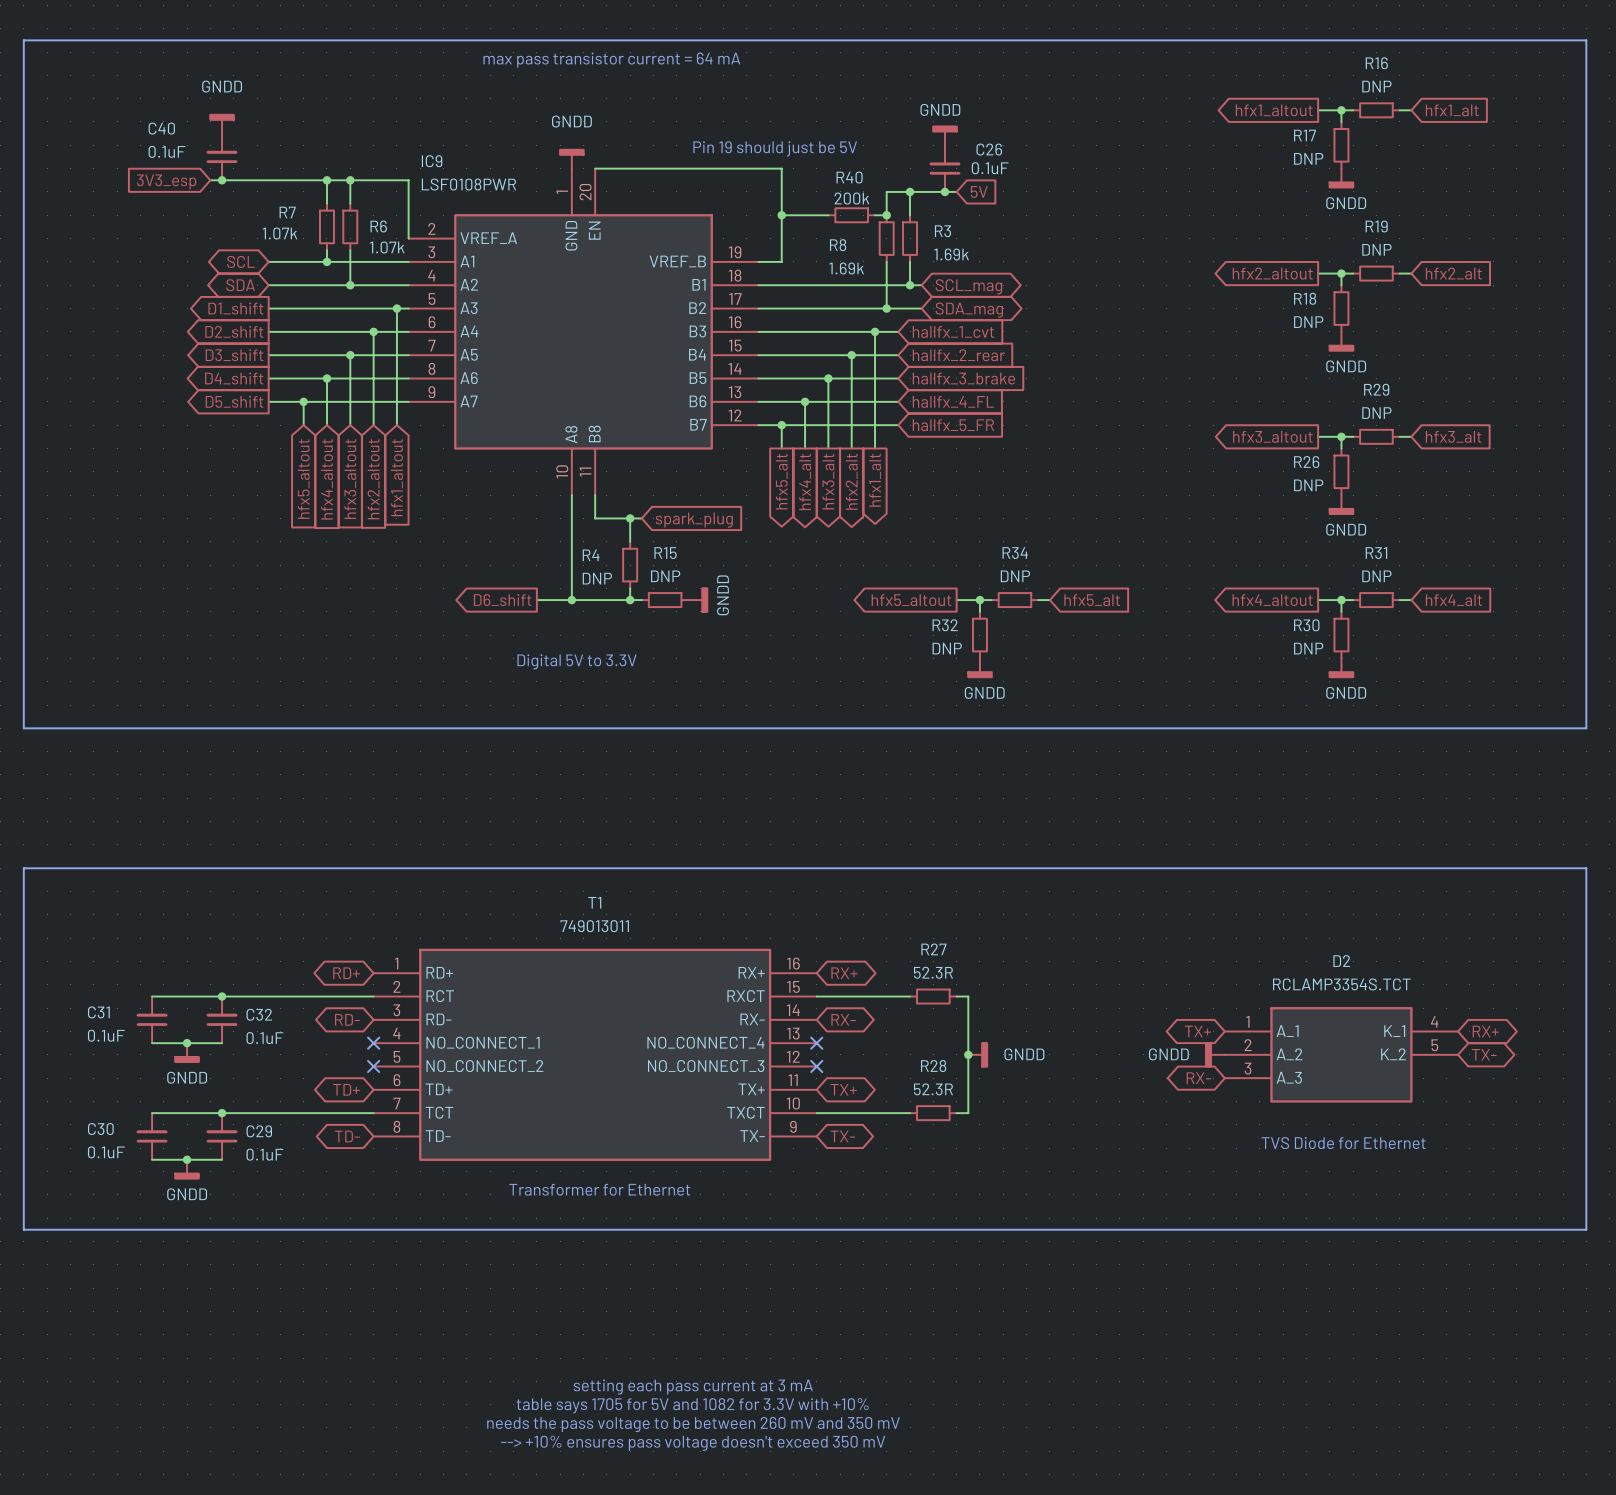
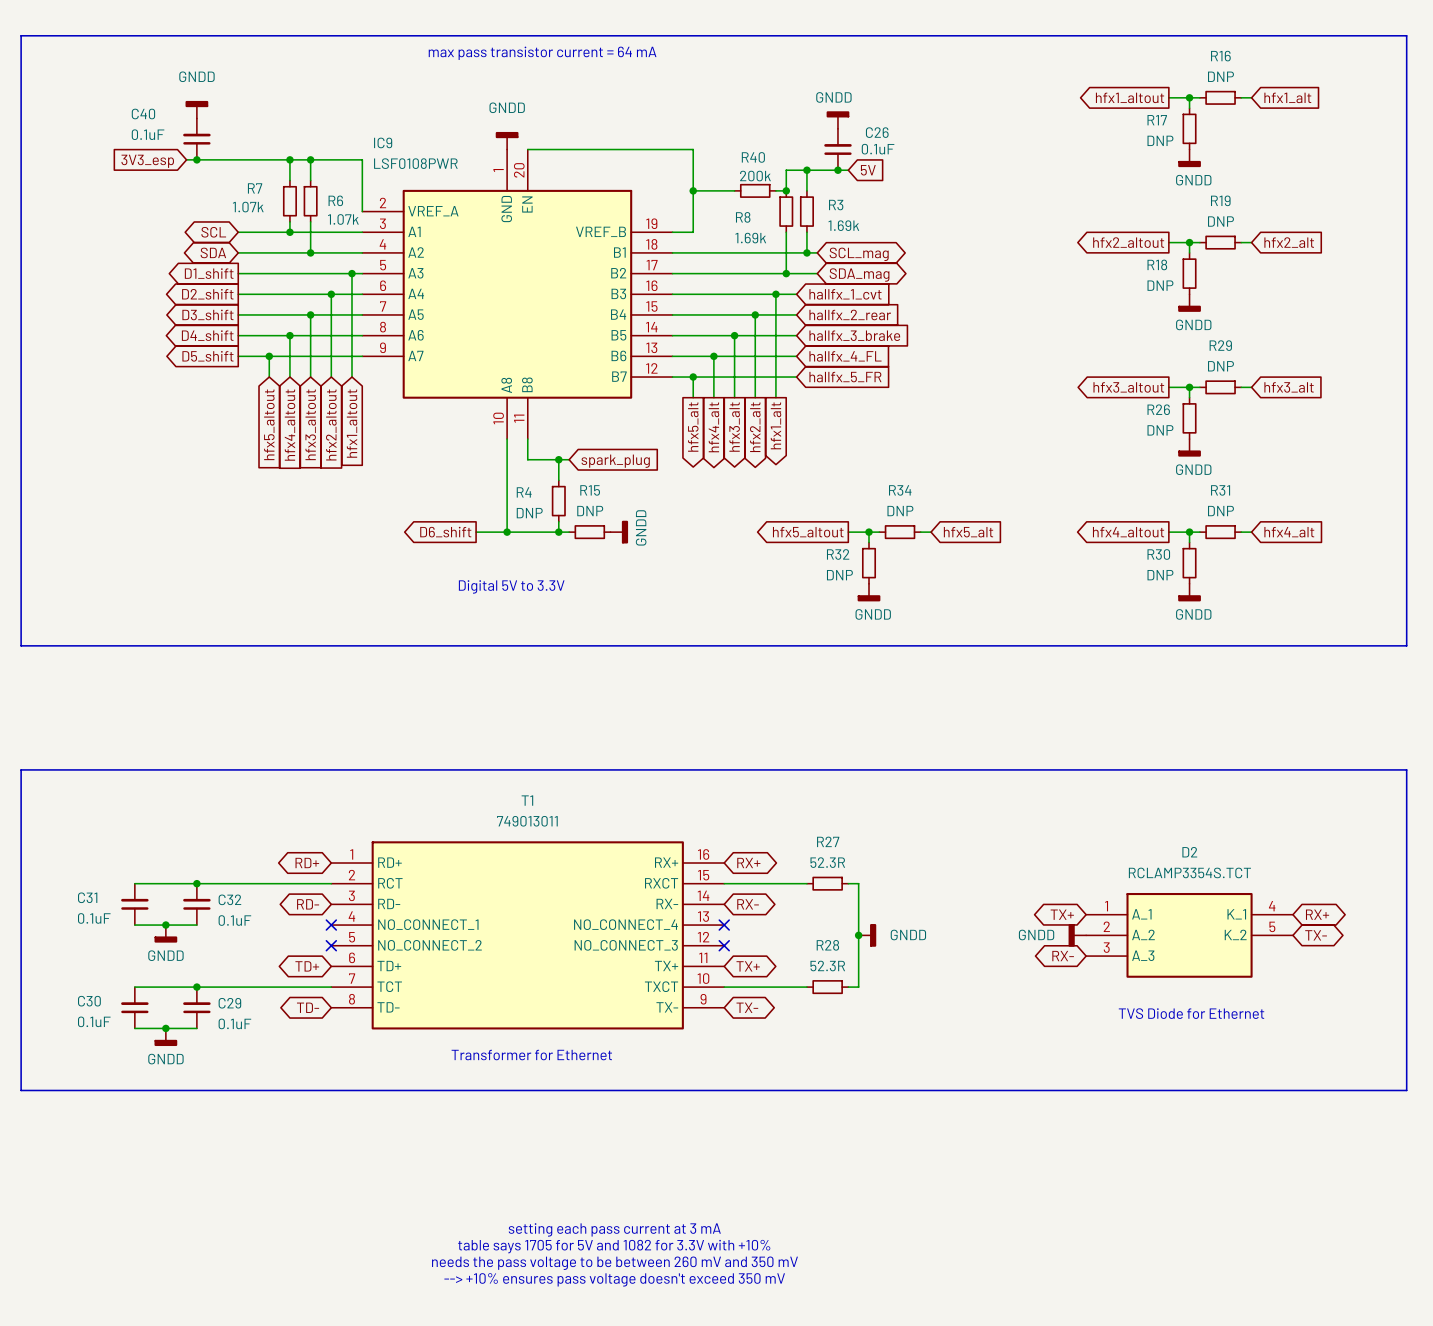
text: Pin 19 should just be 5V (775, 148) -> none

